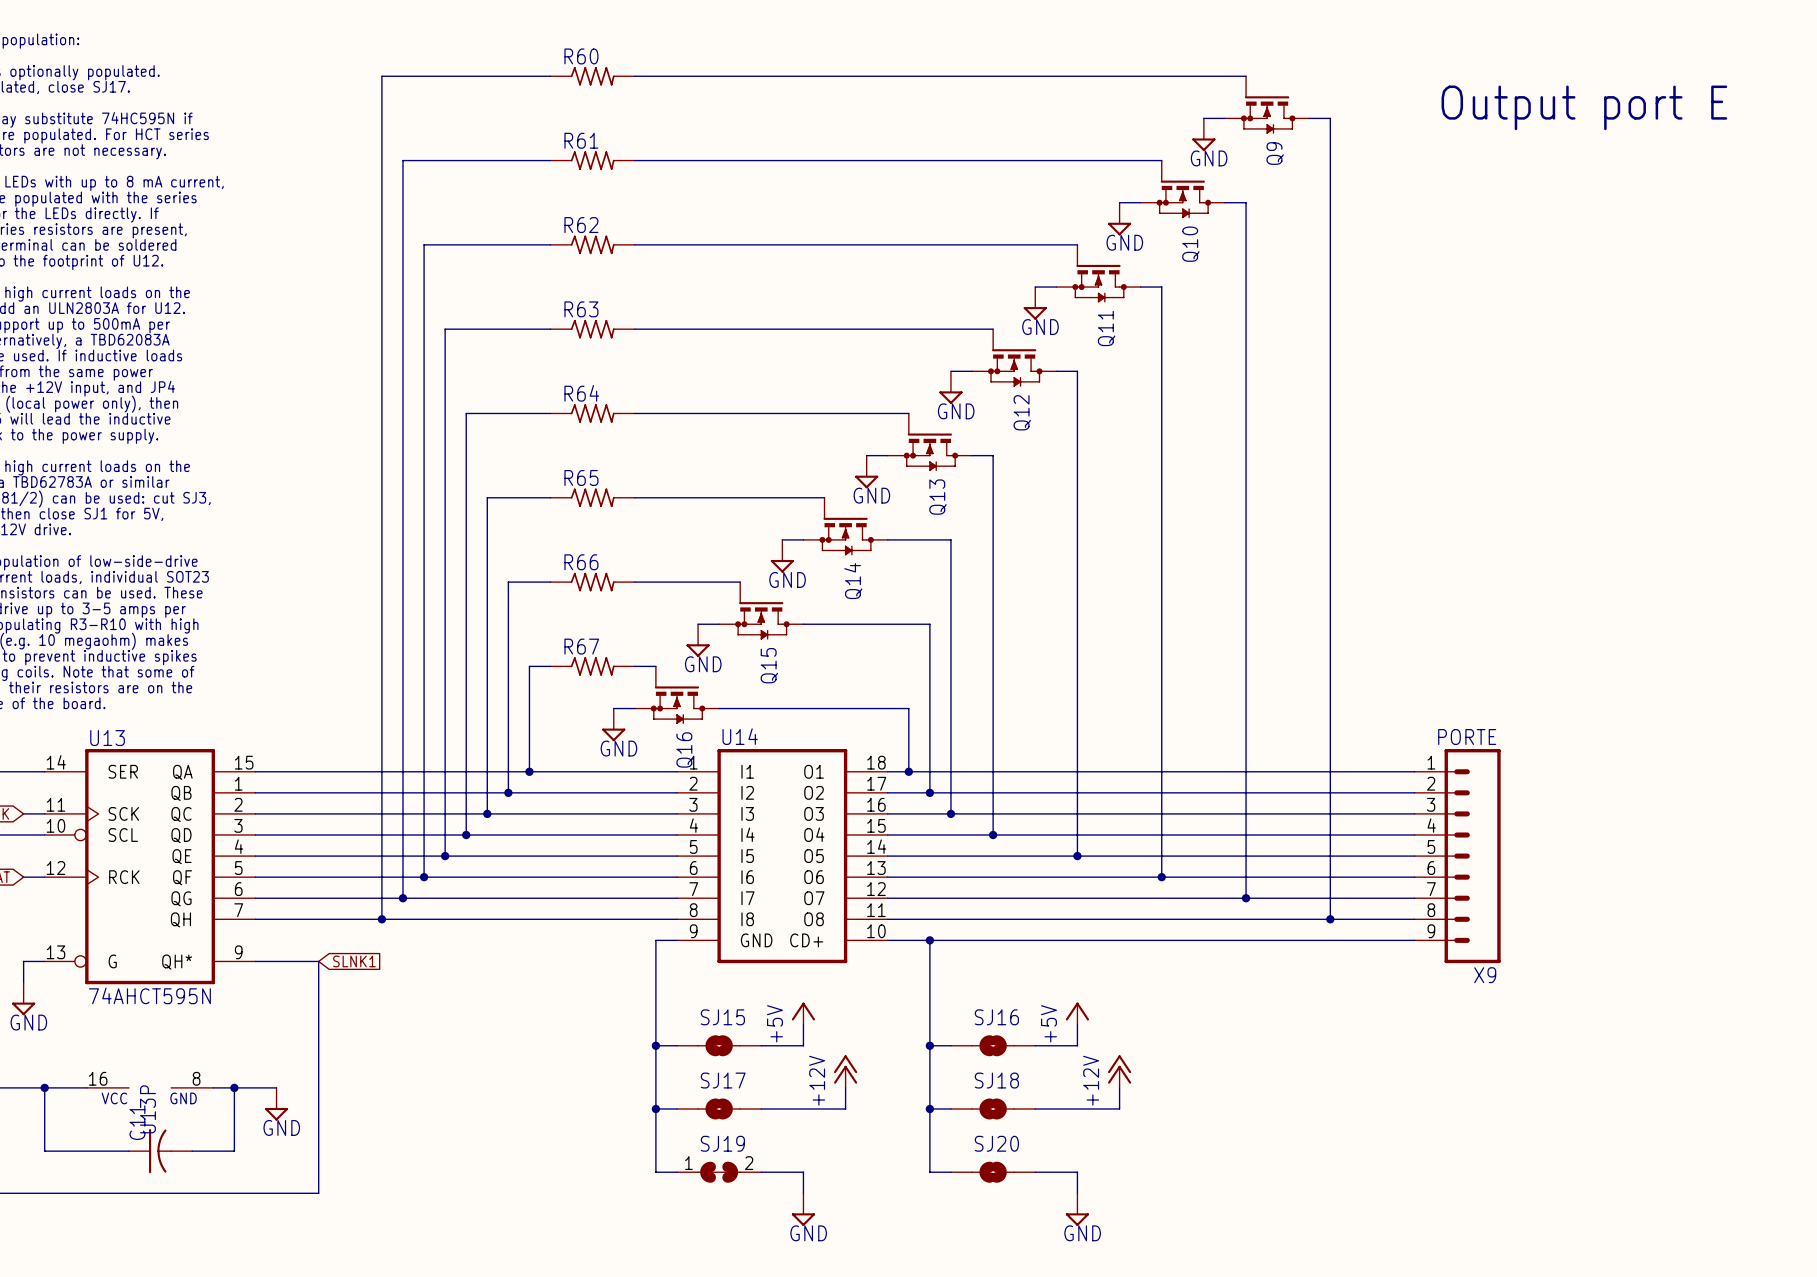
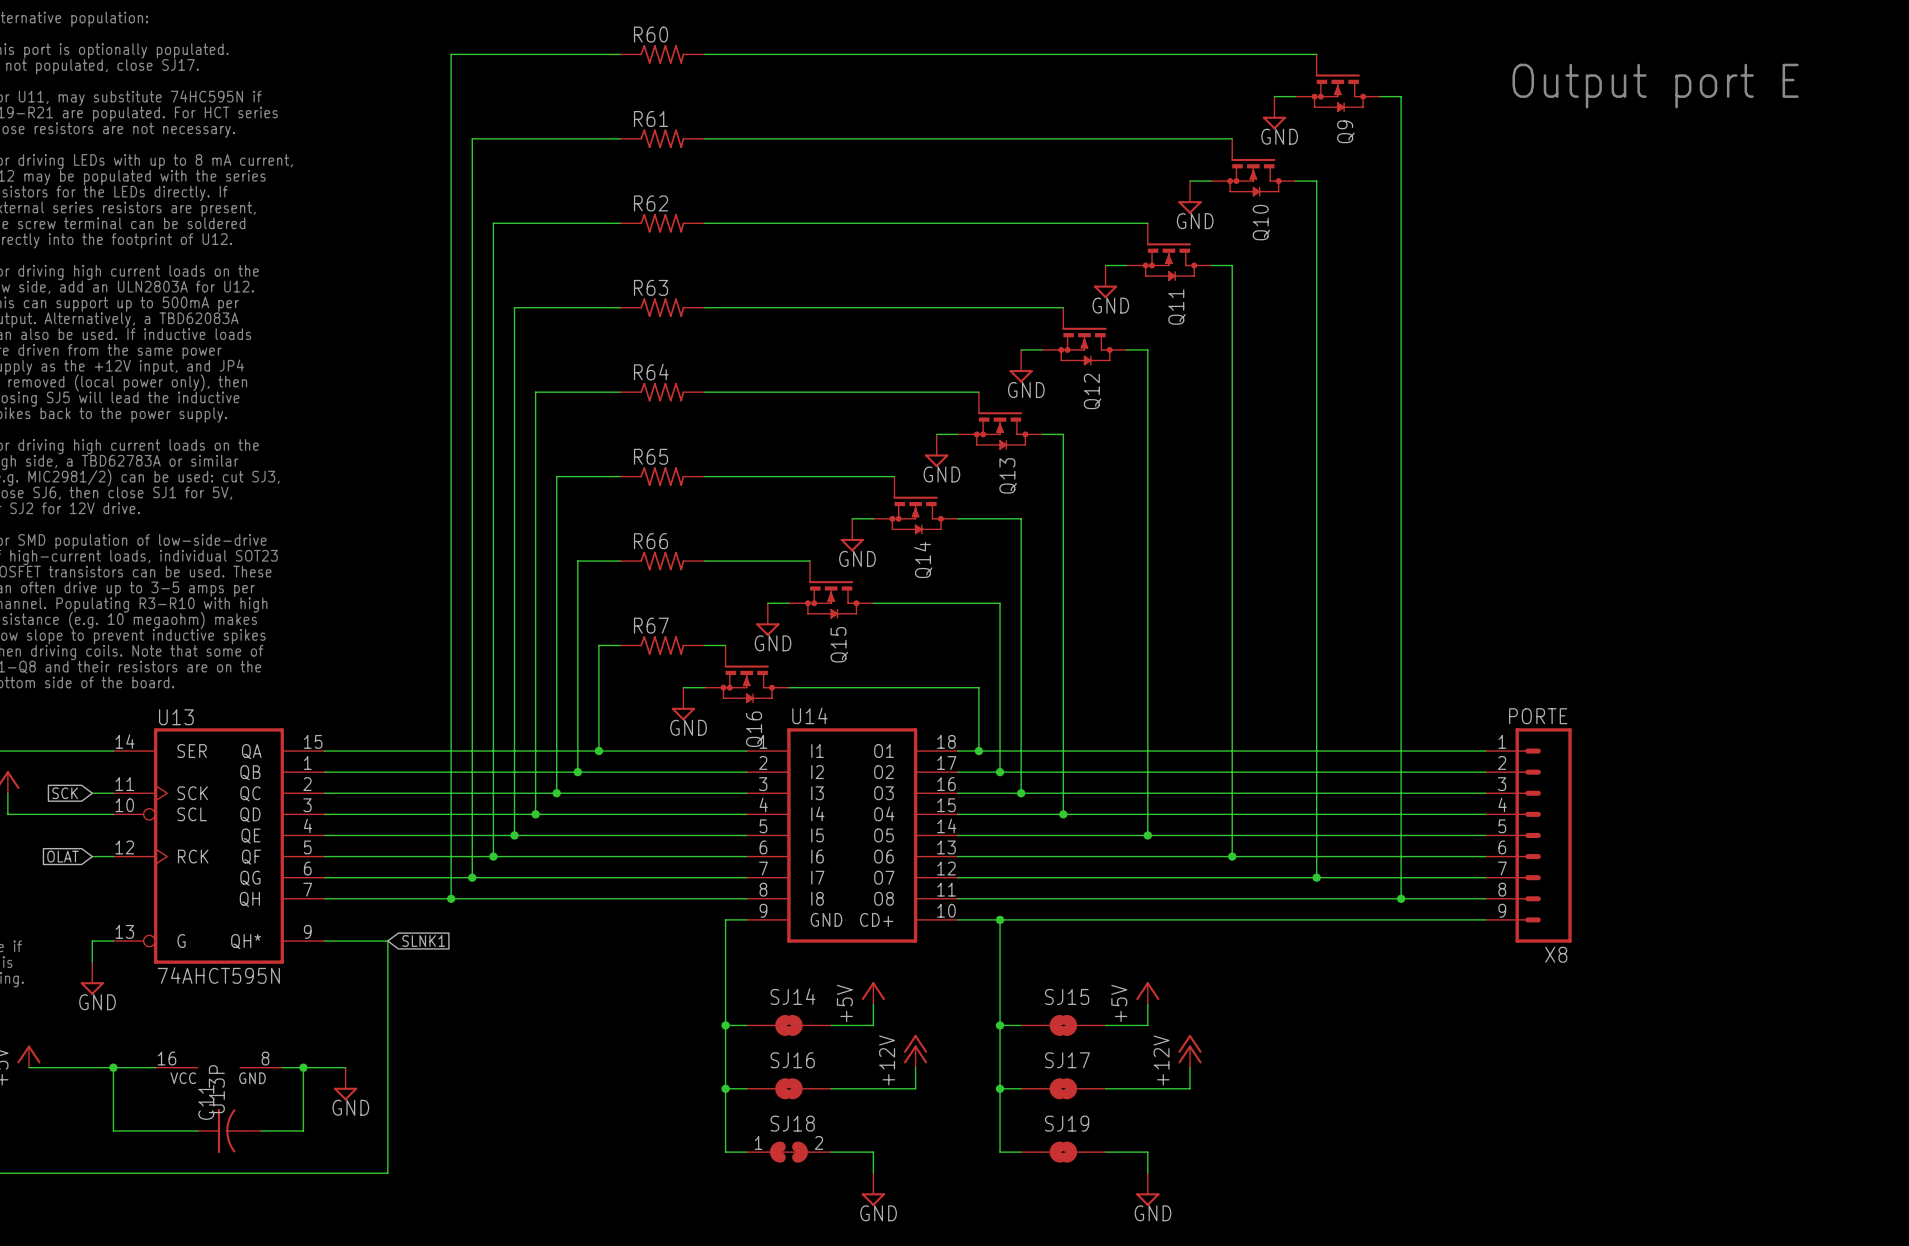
X9 name: X9 (1485, 975) -> X8 (1556, 954)
SJ15 name: SJ15 (722, 1017) -> SJ14 (792, 996)
SJ16 name: SJ16 (996, 1017) -> SJ15 (1067, 996)
SJ17 name: SJ17 (723, 1080) -> SJ16 (792, 1060)
SJ18 name: SJ18 (996, 1080) -> SJ17 (1067, 1060)
SJ19 name: SJ19 (722, 1143) -> SJ18 (792, 1123)
SJ20 name: SJ20 (996, 1143) -> SJ19 (1067, 1123)

